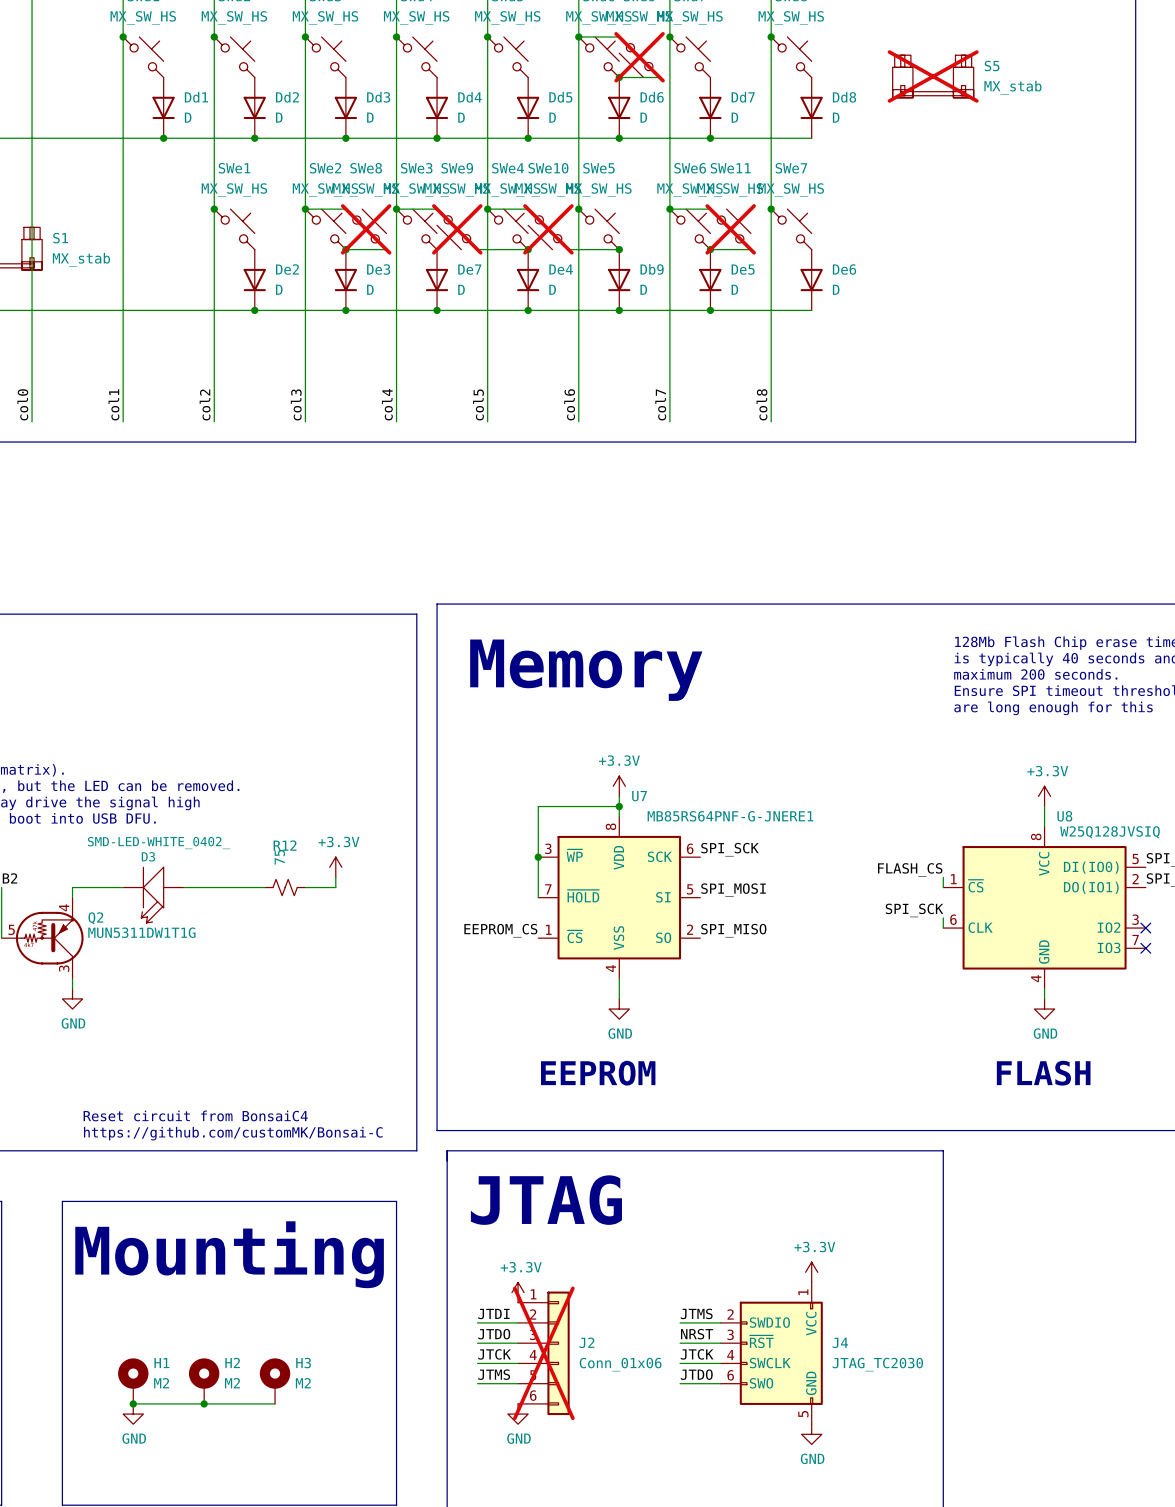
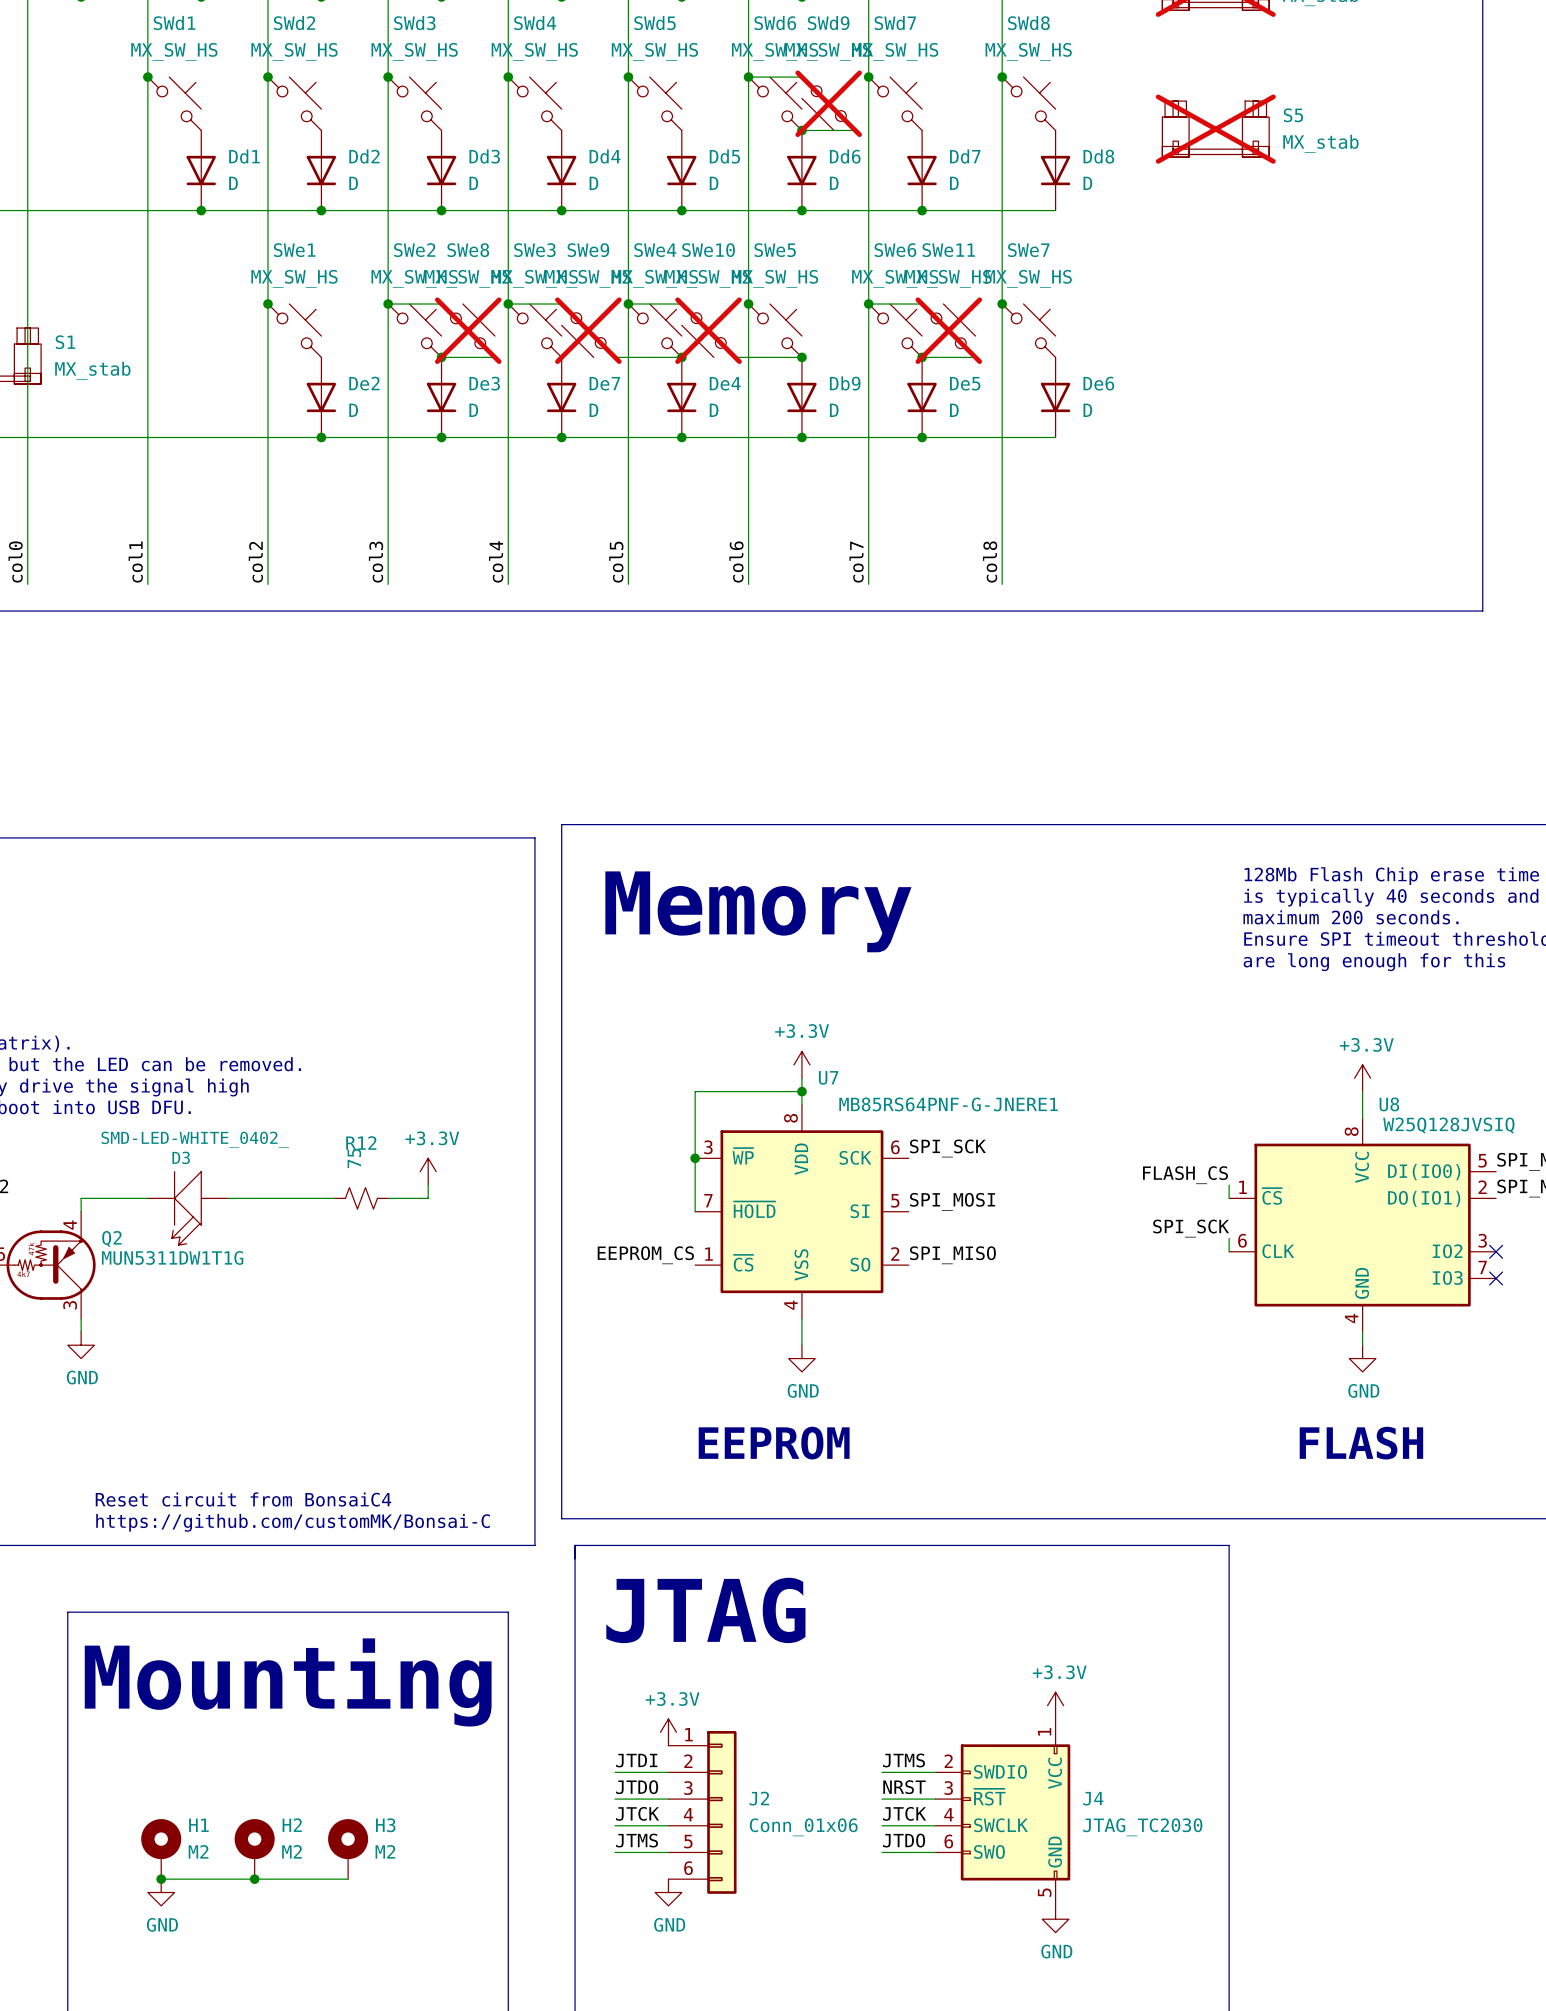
J2 do-not-place cross: (543, 1353) -> none

